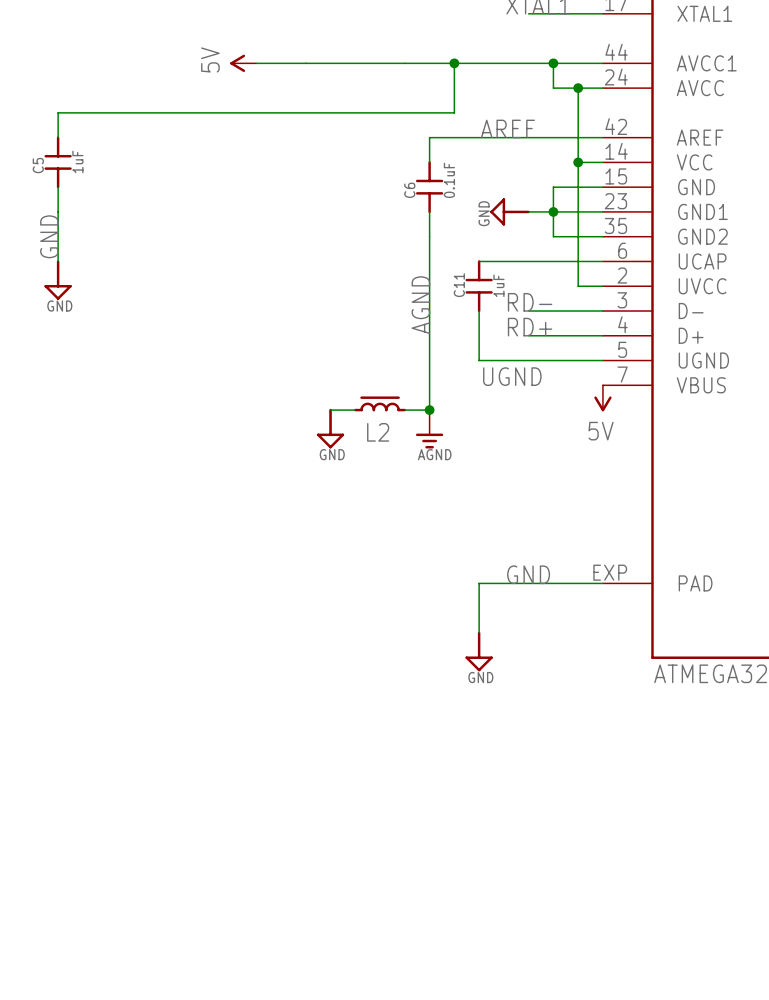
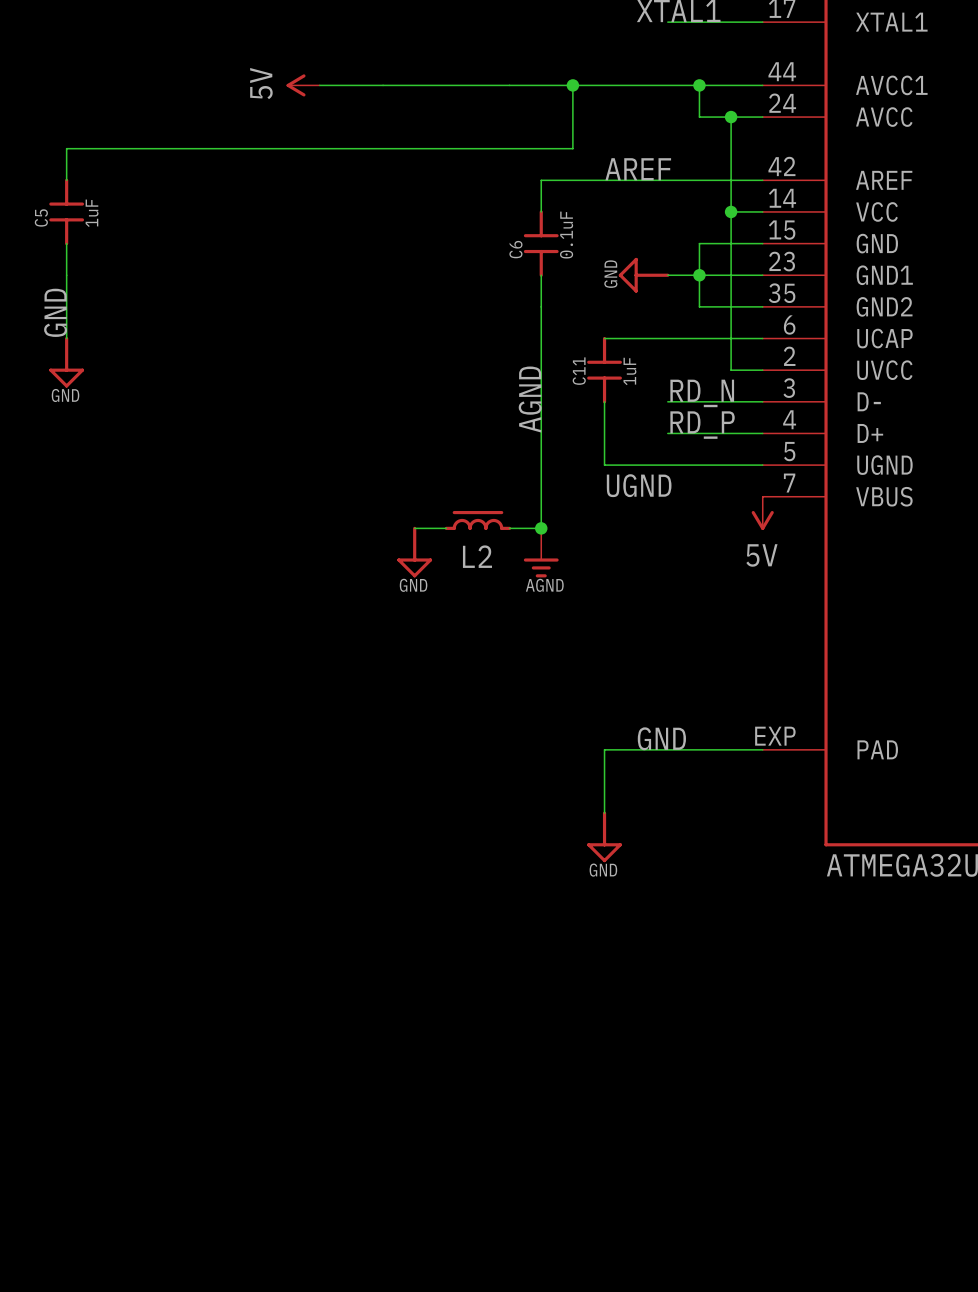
label: RD- (530, 302) -> none
label: none -> RD_N (702, 393)
label: RD+ (530, 327) -> none
label: none -> RD_P (702, 425)

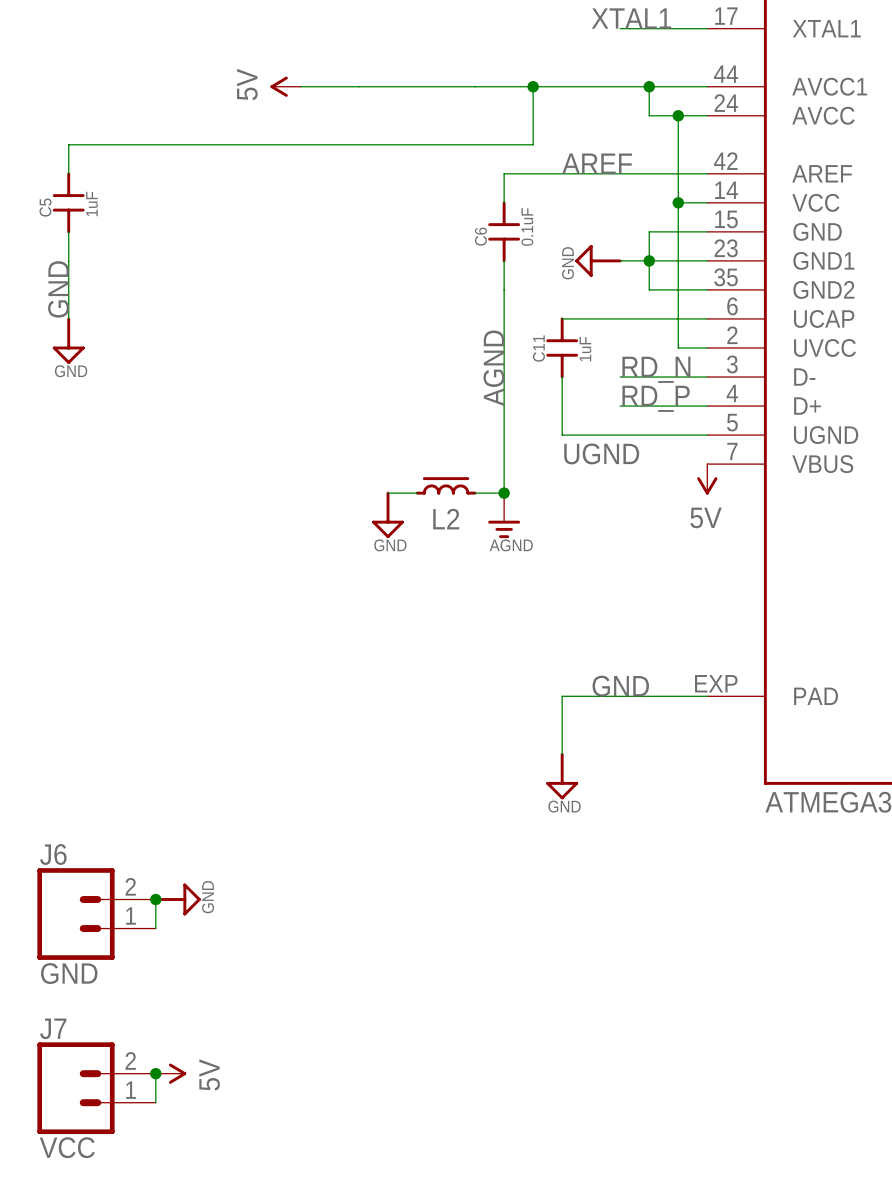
wire: none -> (155, 899) (155, 928)
junction: none -> (155, 899)
power symbol: none -> GND (177, 899)
J6: none -> GND (96, 914)
wire: none -> (155, 1073) (155, 1102)
junction: none -> (155, 1073)
power symbol: none -> 5V (171, 1073)
J7: none -> VCC (96, 1088)

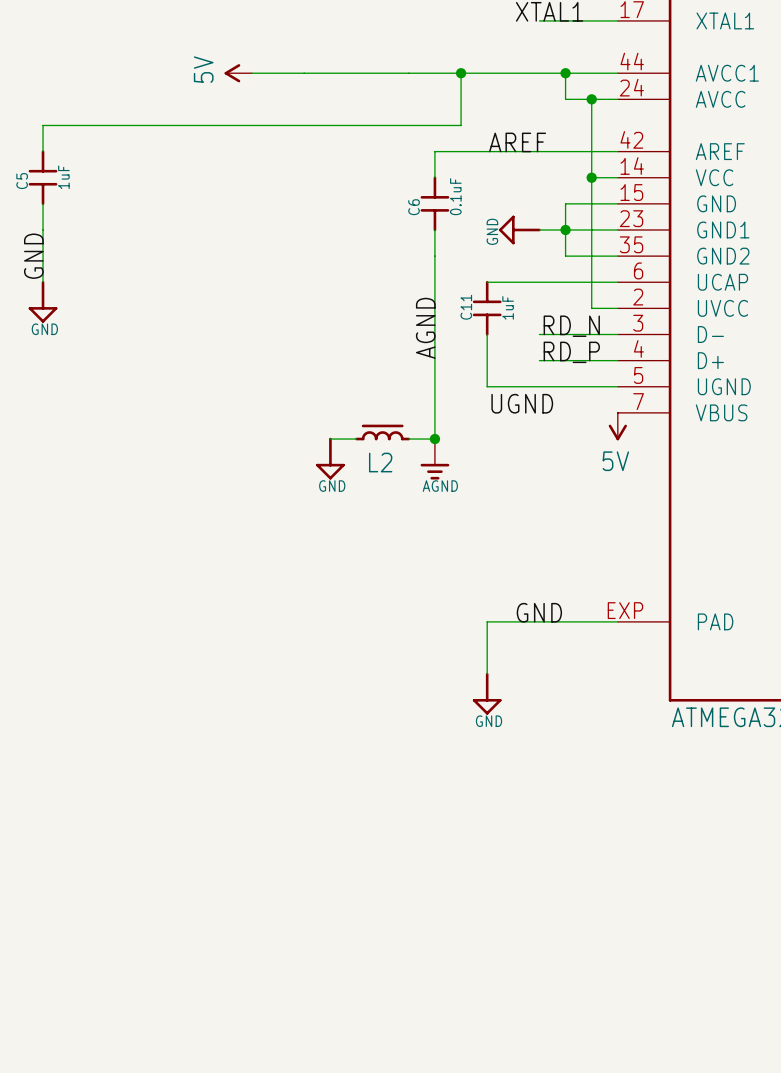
wire: (155, 899) (155, 928) -> none
junction: (155, 899) -> none
power symbol: GND (177, 899) -> none
J6: GND (96, 914) -> none
wire: (155, 1073) (155, 1102) -> none
junction: (155, 1073) -> none
power symbol: 5V (171, 1073) -> none
J7: VCC (96, 1088) -> none

